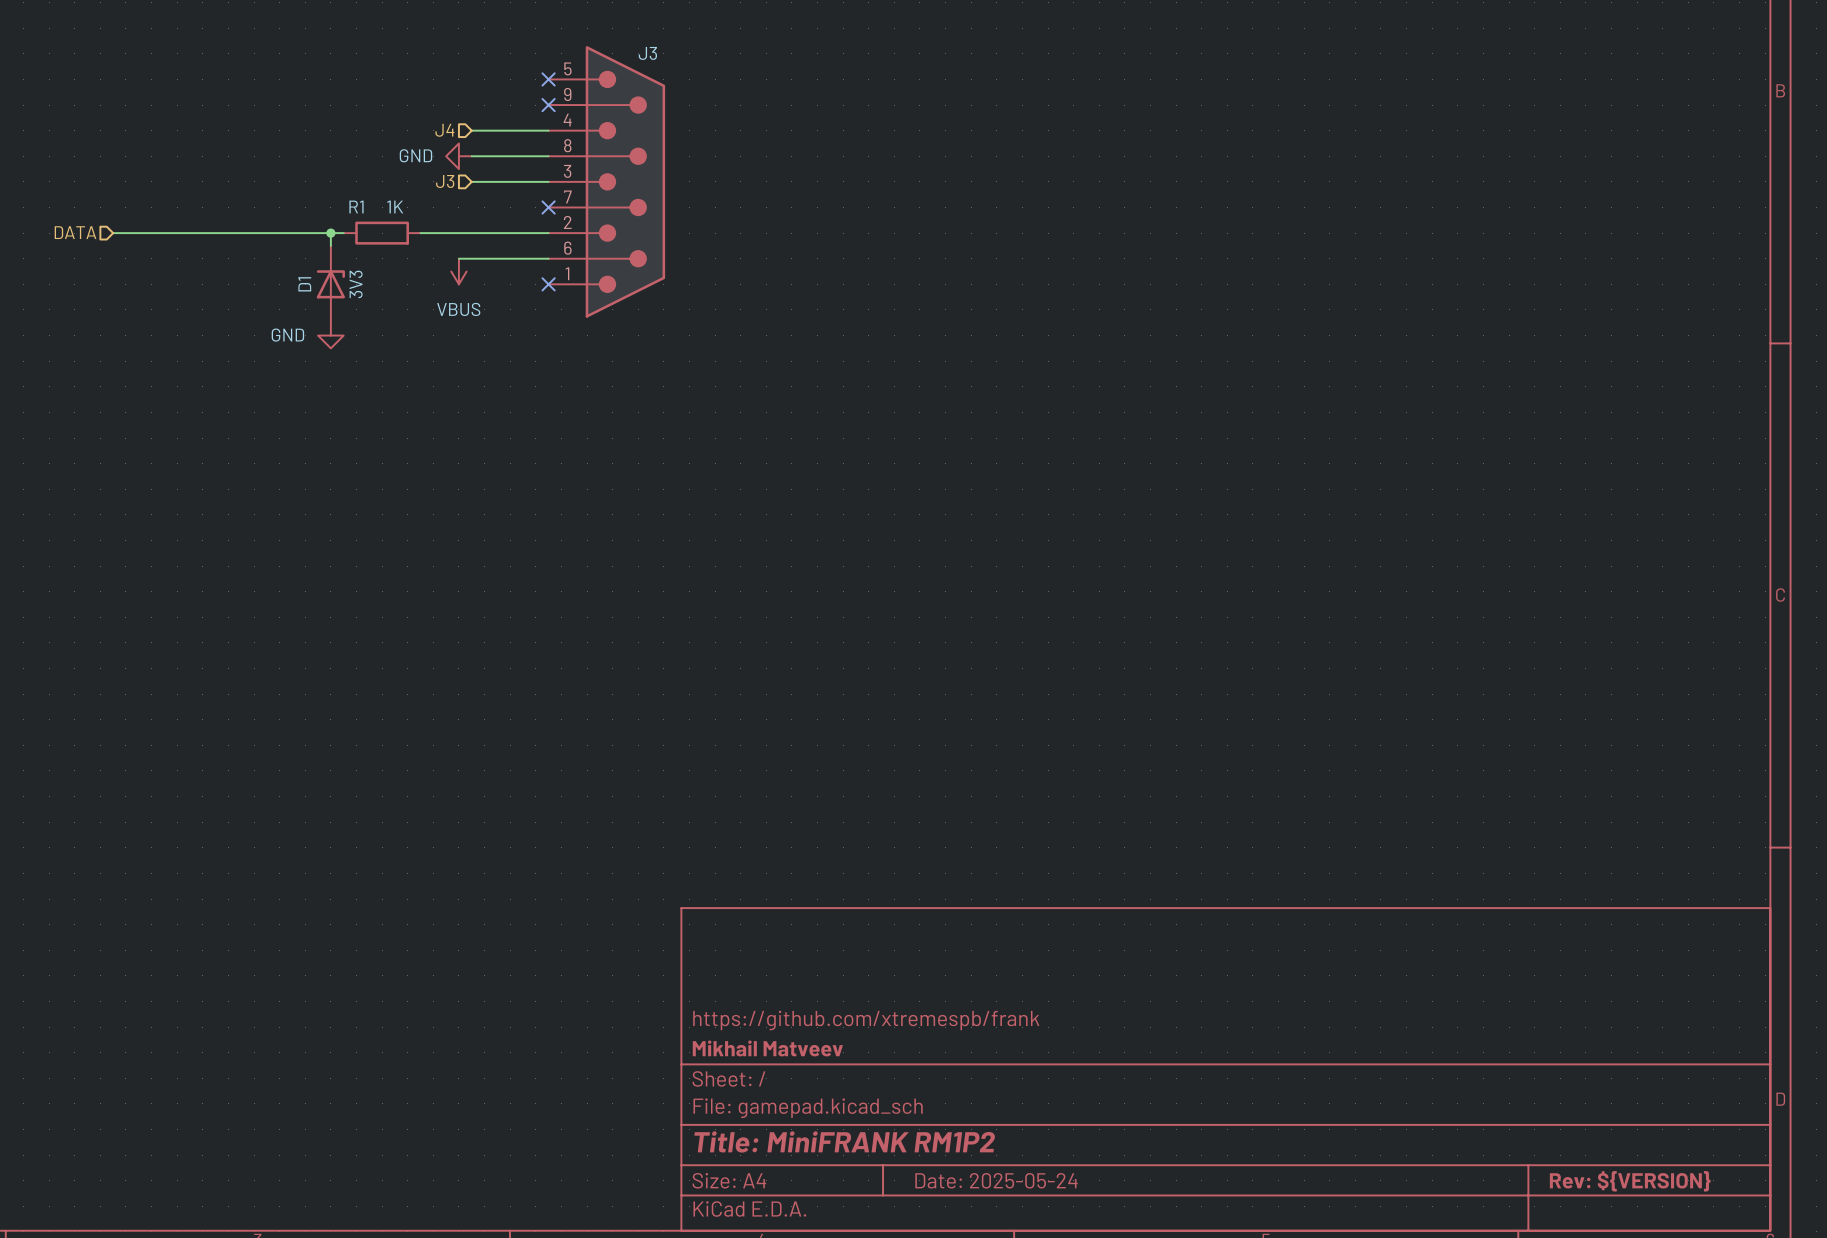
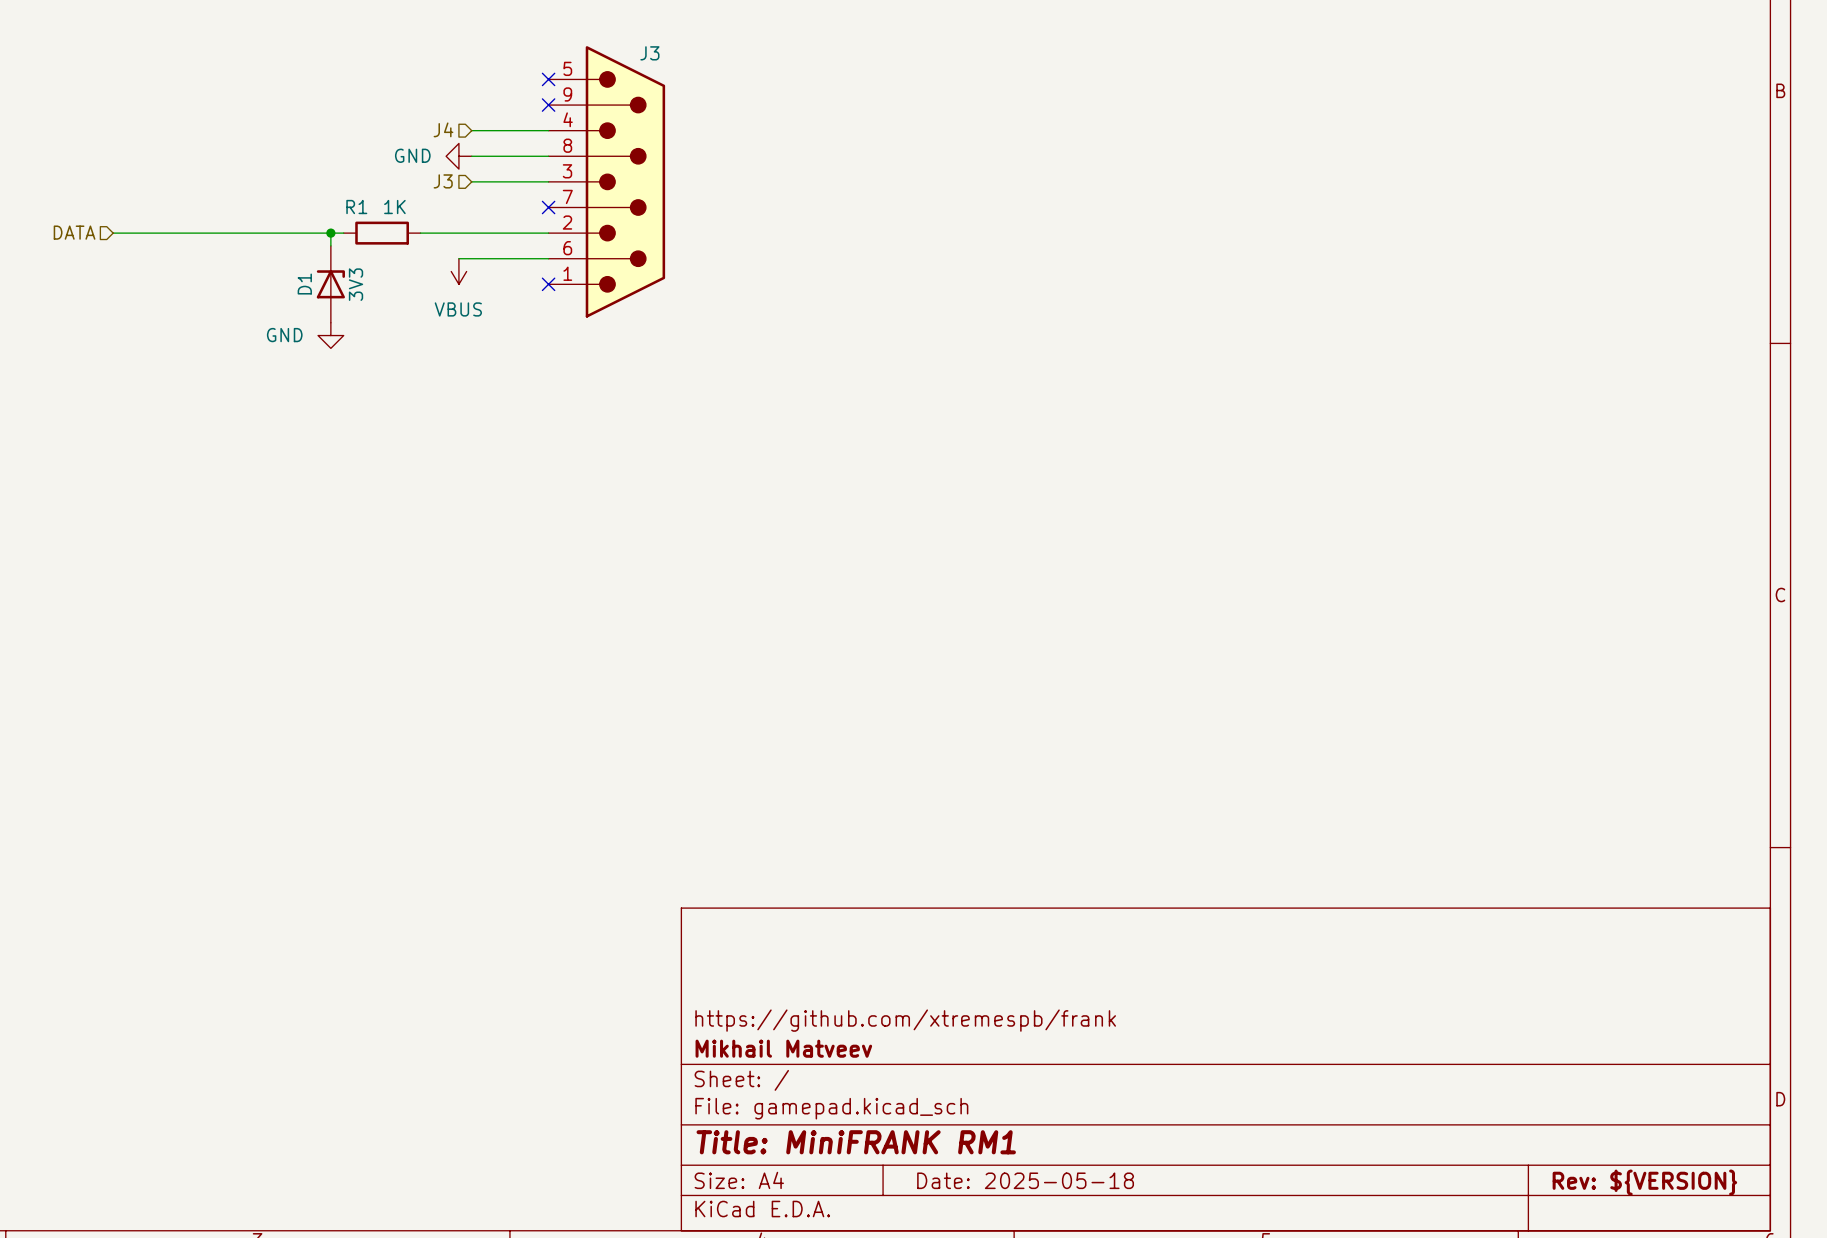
title block: Title: MiniFRANK RM1P2 (844, 1141) -> Title: MiniFRANK RM1 (856, 1142)
title block: Date: 2025-05-24 (996, 1180) -> Date: 2025-05-18 (1025, 1180)

